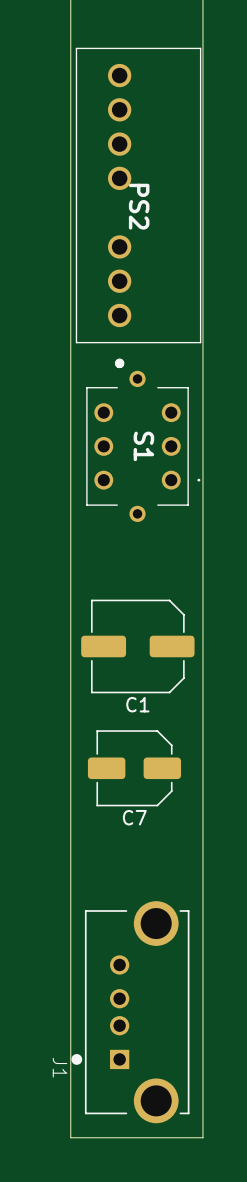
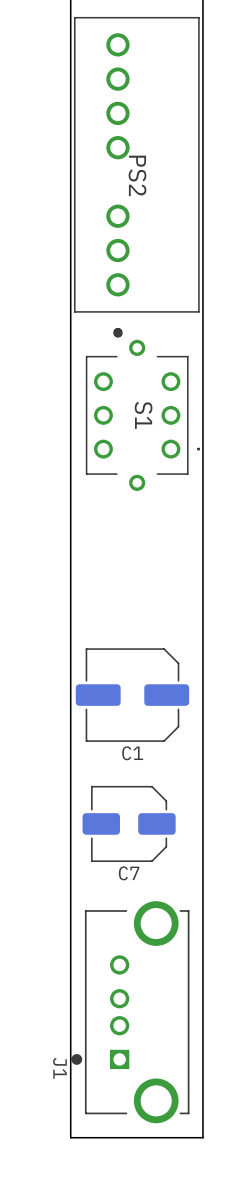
PS2 position: (138, 207) -> (136, 177)
S1 position: (143, 446) -> (142, 415)
C1 position: (137, 646) -> (132, 695)
C7 position: (134, 768) -> (129, 823)

